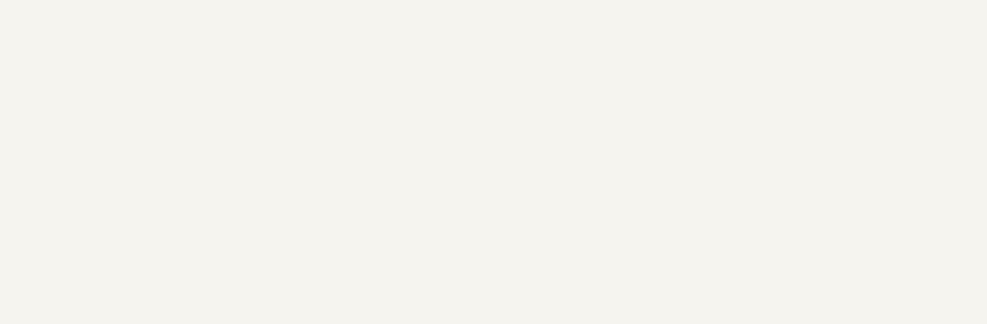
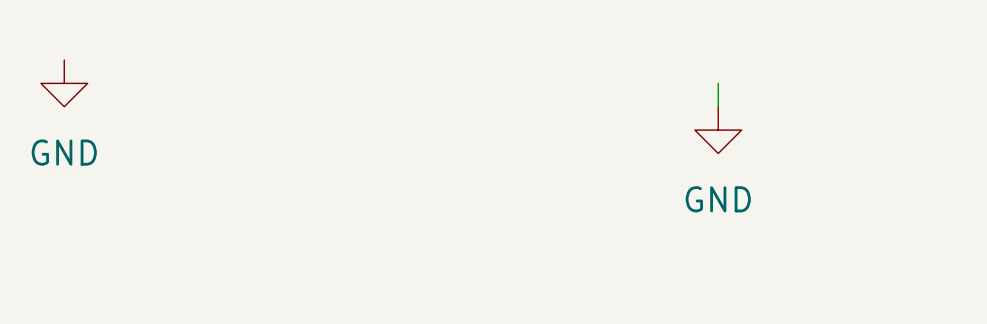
power symbol: none -> GND (64, 83)
wire: none -> (718, 83) (718, 106)
power symbol: none -> GND (718, 130)

